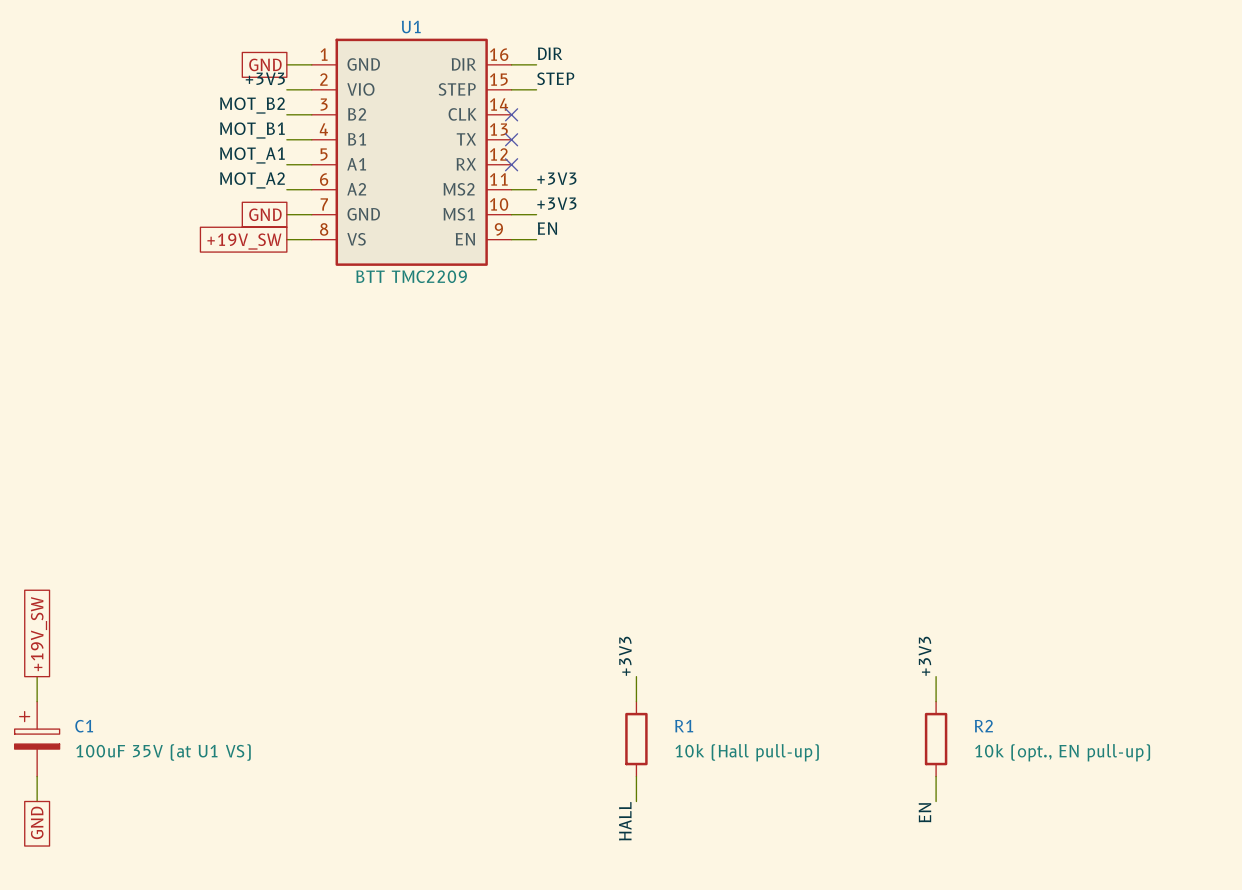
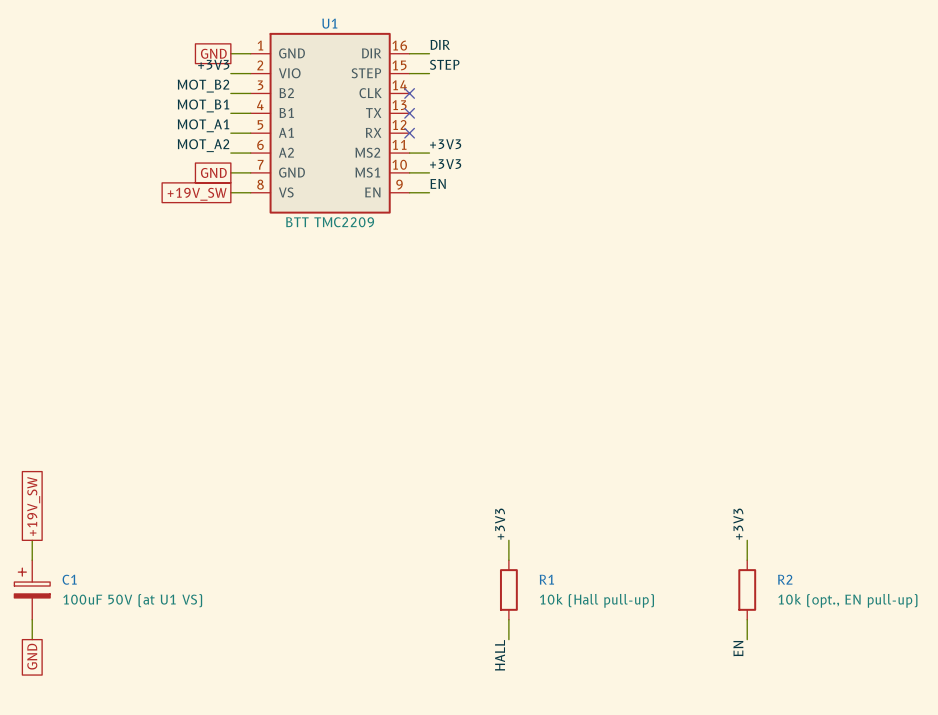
C1 value: 100uF 35V (at U1 VS) (163, 752) -> 100uF 50V (at U1 VS) (132, 600)

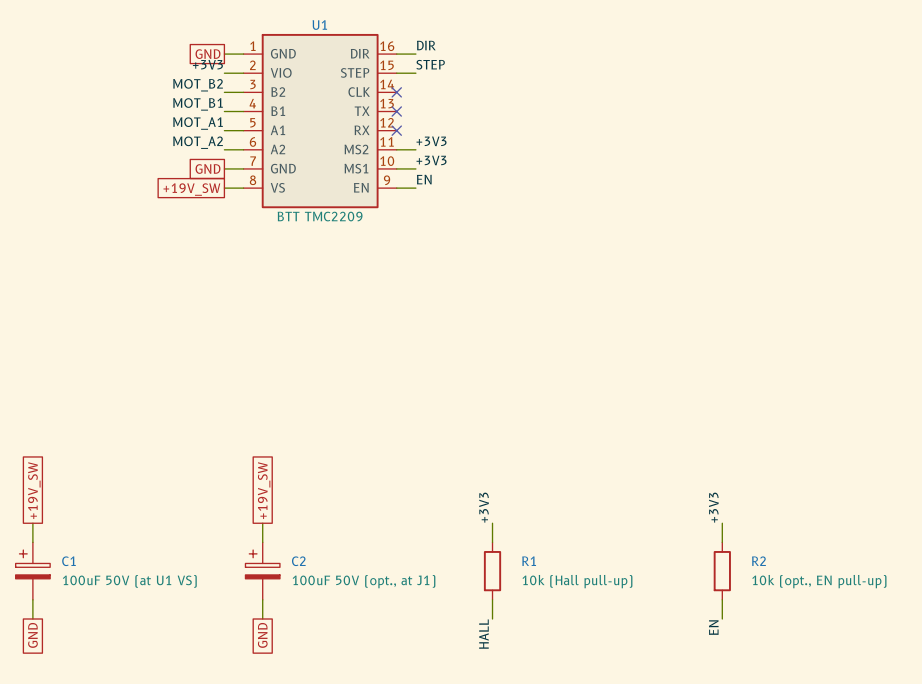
global label: none -> +19V_SW (264, 490)
wire: none -> (262, 523) (262, 542)
C2: none -> 100uF 50V (opt., at J1) (262, 571)
wire: none -> (262, 599) (262, 618)
global label: none -> GND (262, 635)

